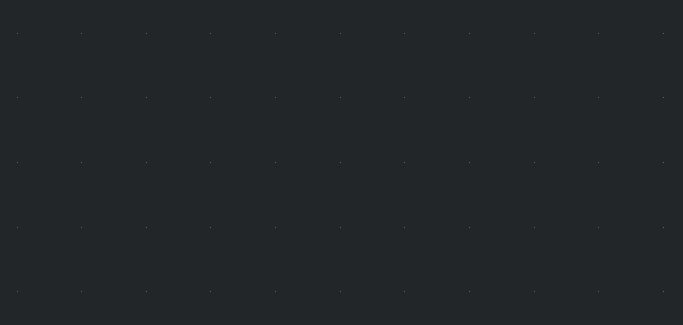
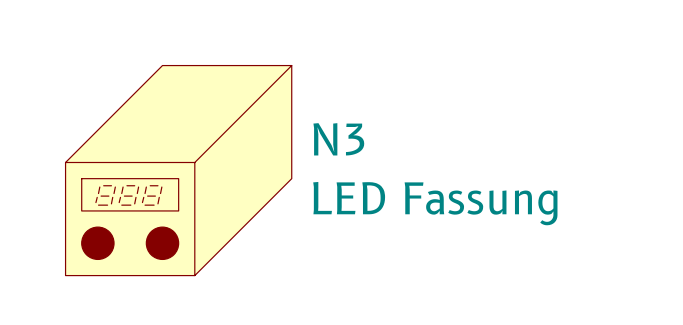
N3: none -> LED Fassung (178, 170)

